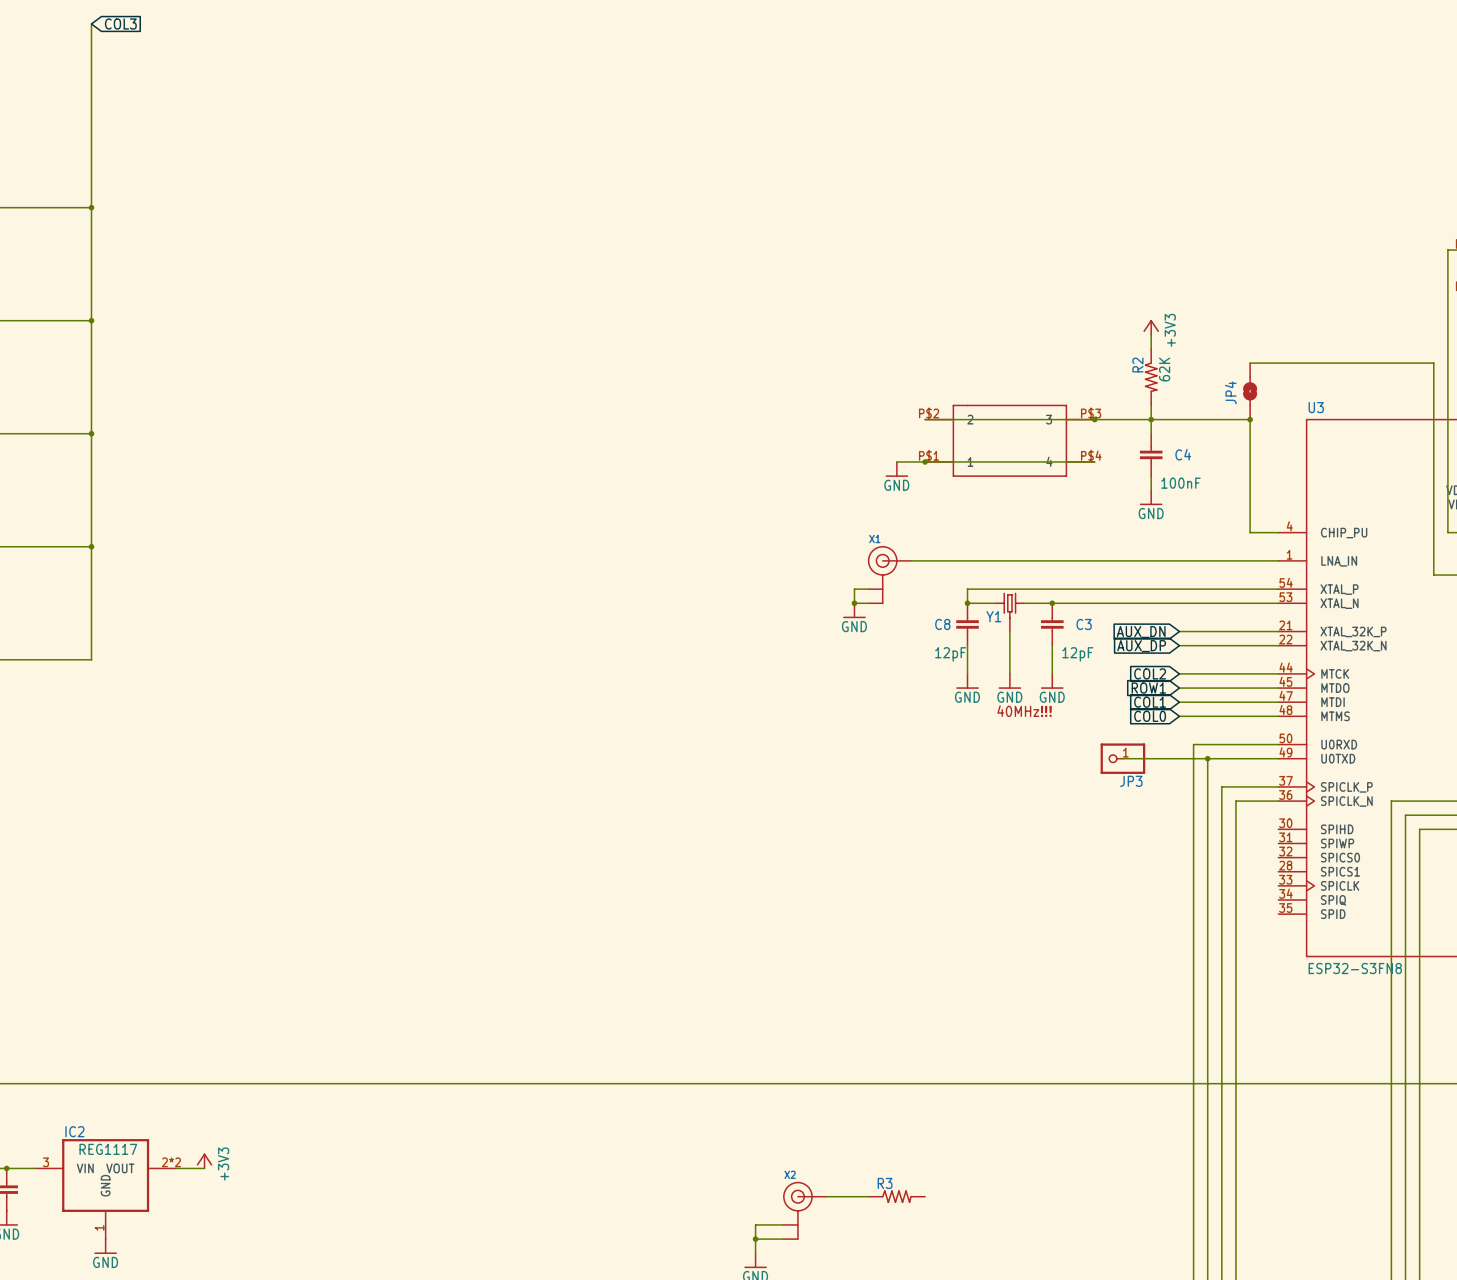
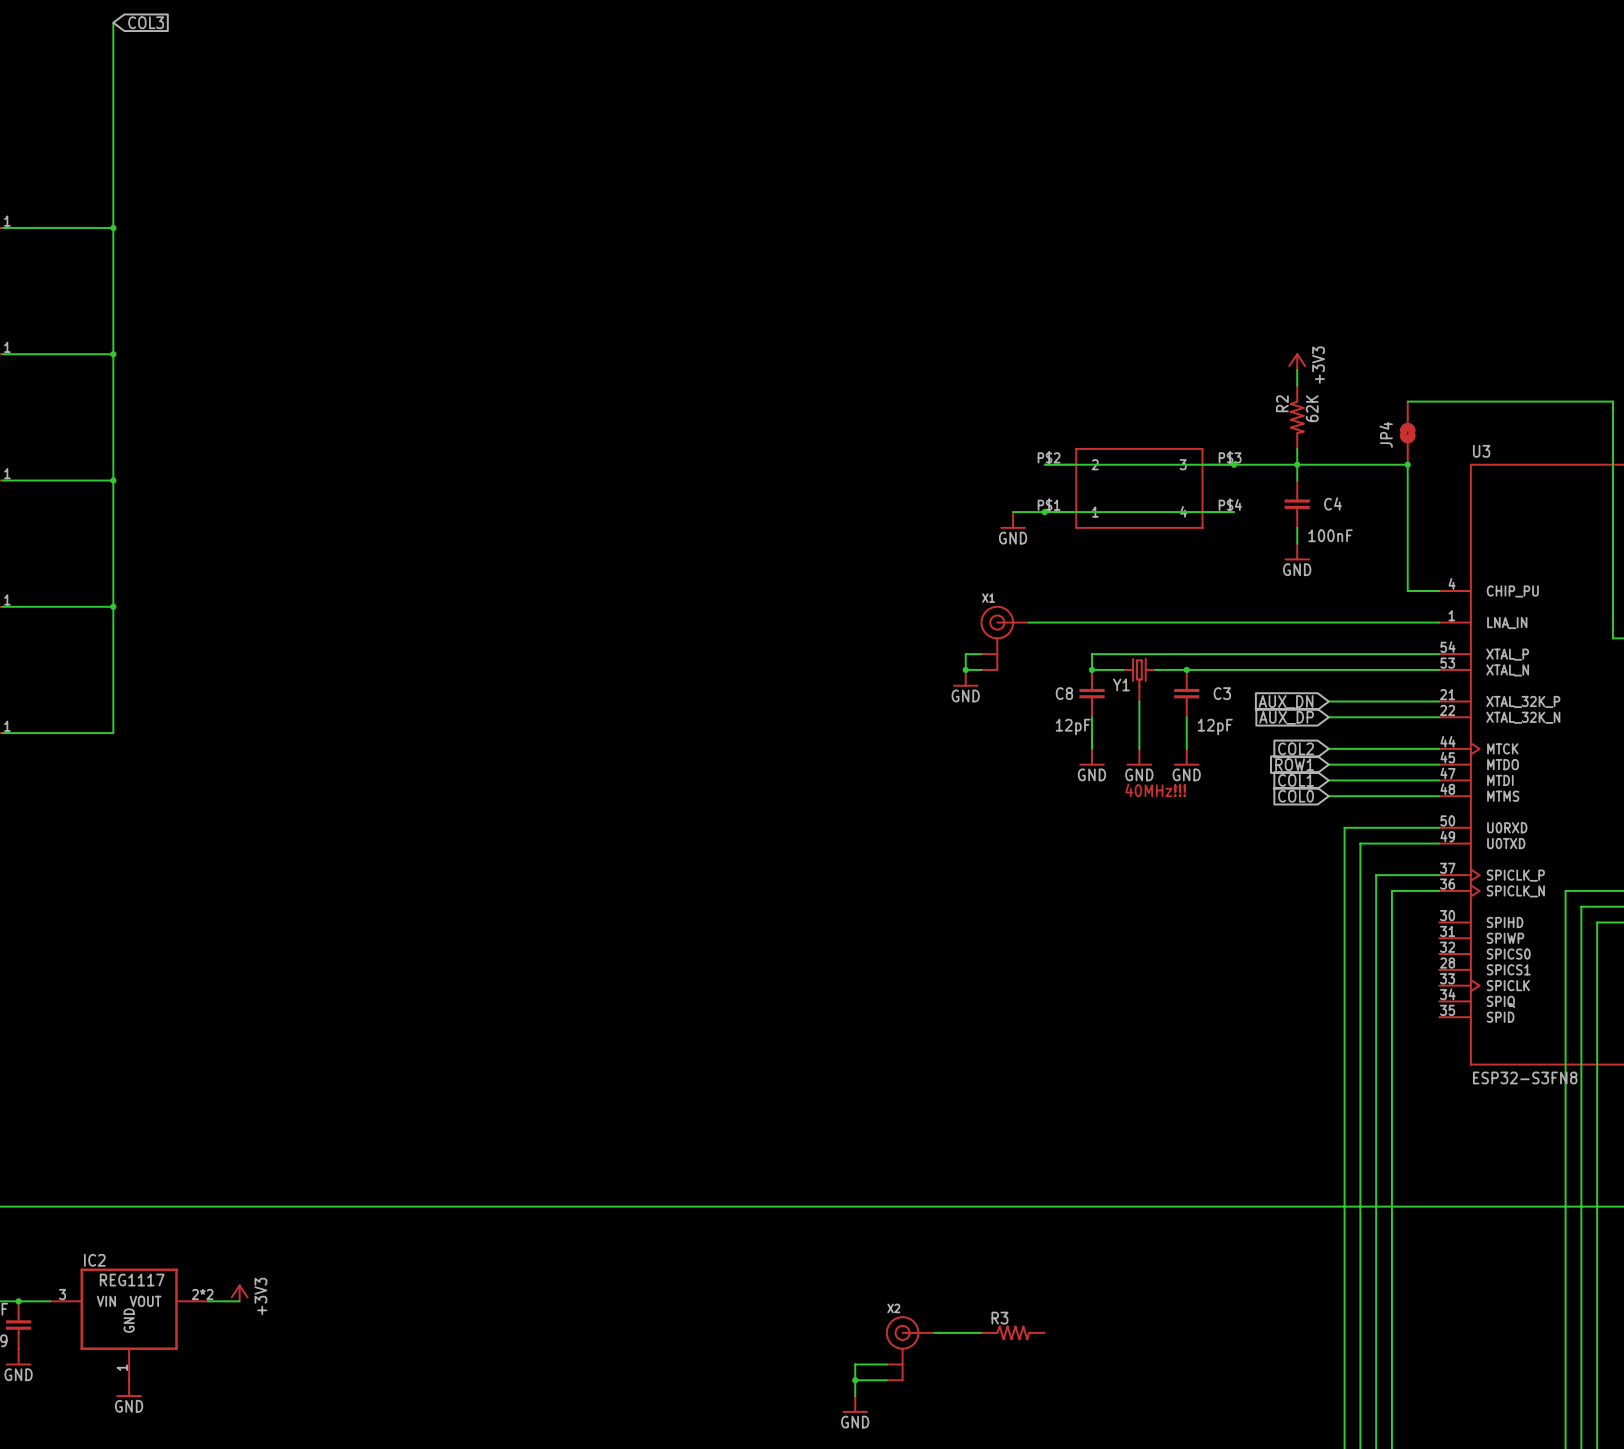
wire: (1122, 758) (1207, 758) -> none
JP3: (1122, 758) -> none
junction: (1207, 758) -> none

